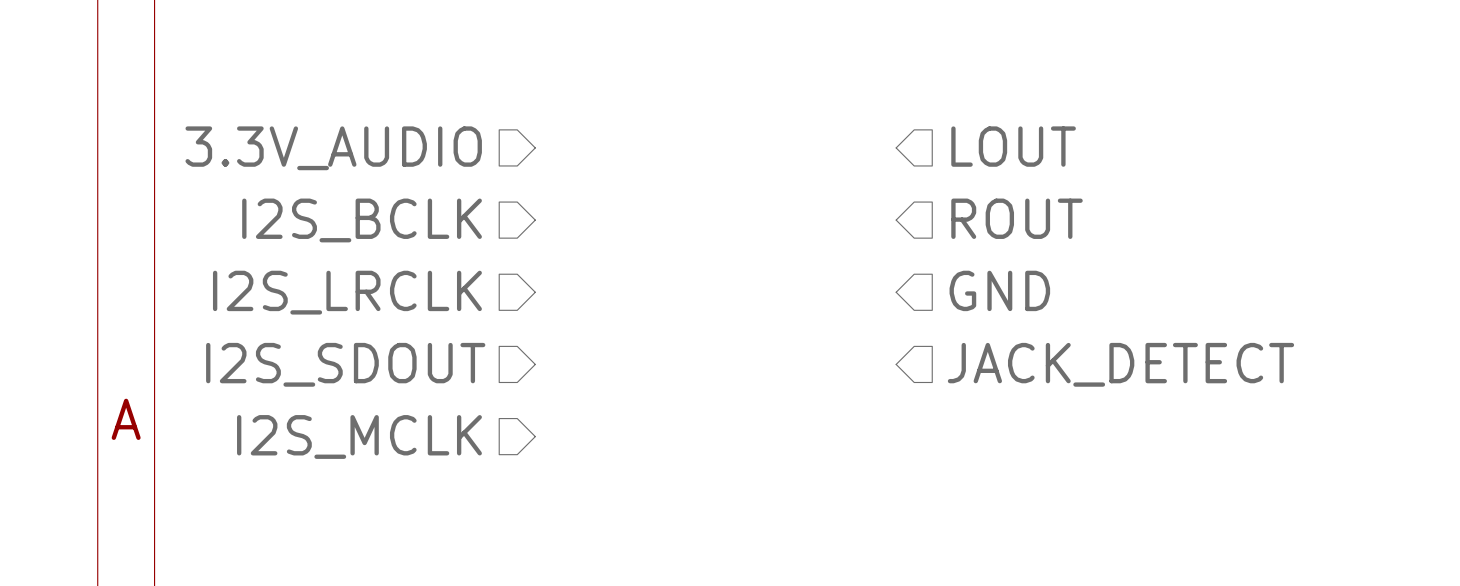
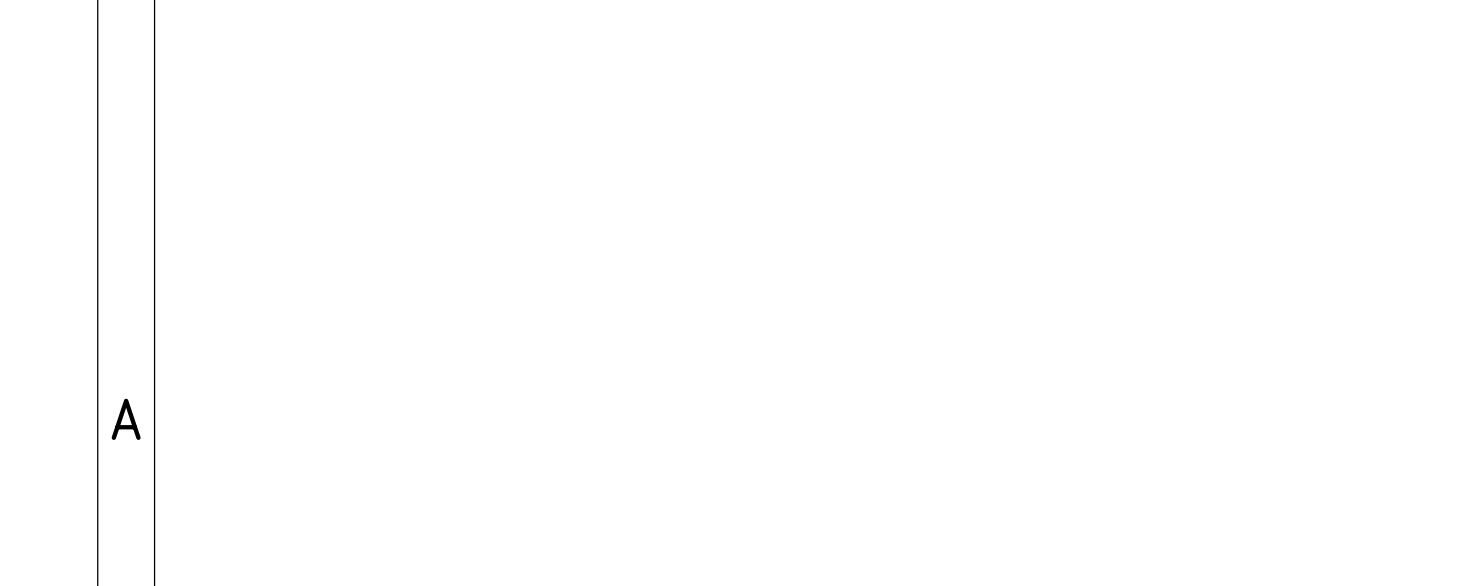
hierarchical label: LOUT (1013, 146) -> none
hierarchical label: 3.3V_AUDIO (333, 148) -> none
hierarchical label: ROUT (1017, 218) -> none
hierarchical label: I2S_BCLK (362, 220) -> none
hierarchical label: GND (999, 290) -> none
hierarchical label: I2S_LRCLK (347, 292) -> none
hierarchical label: I2S_SDOUT (345, 364) -> none
hierarchical label: JACK_DETECT (1120, 364) -> none
hierarchical label: I2S_MCLK (359, 436) -> none

